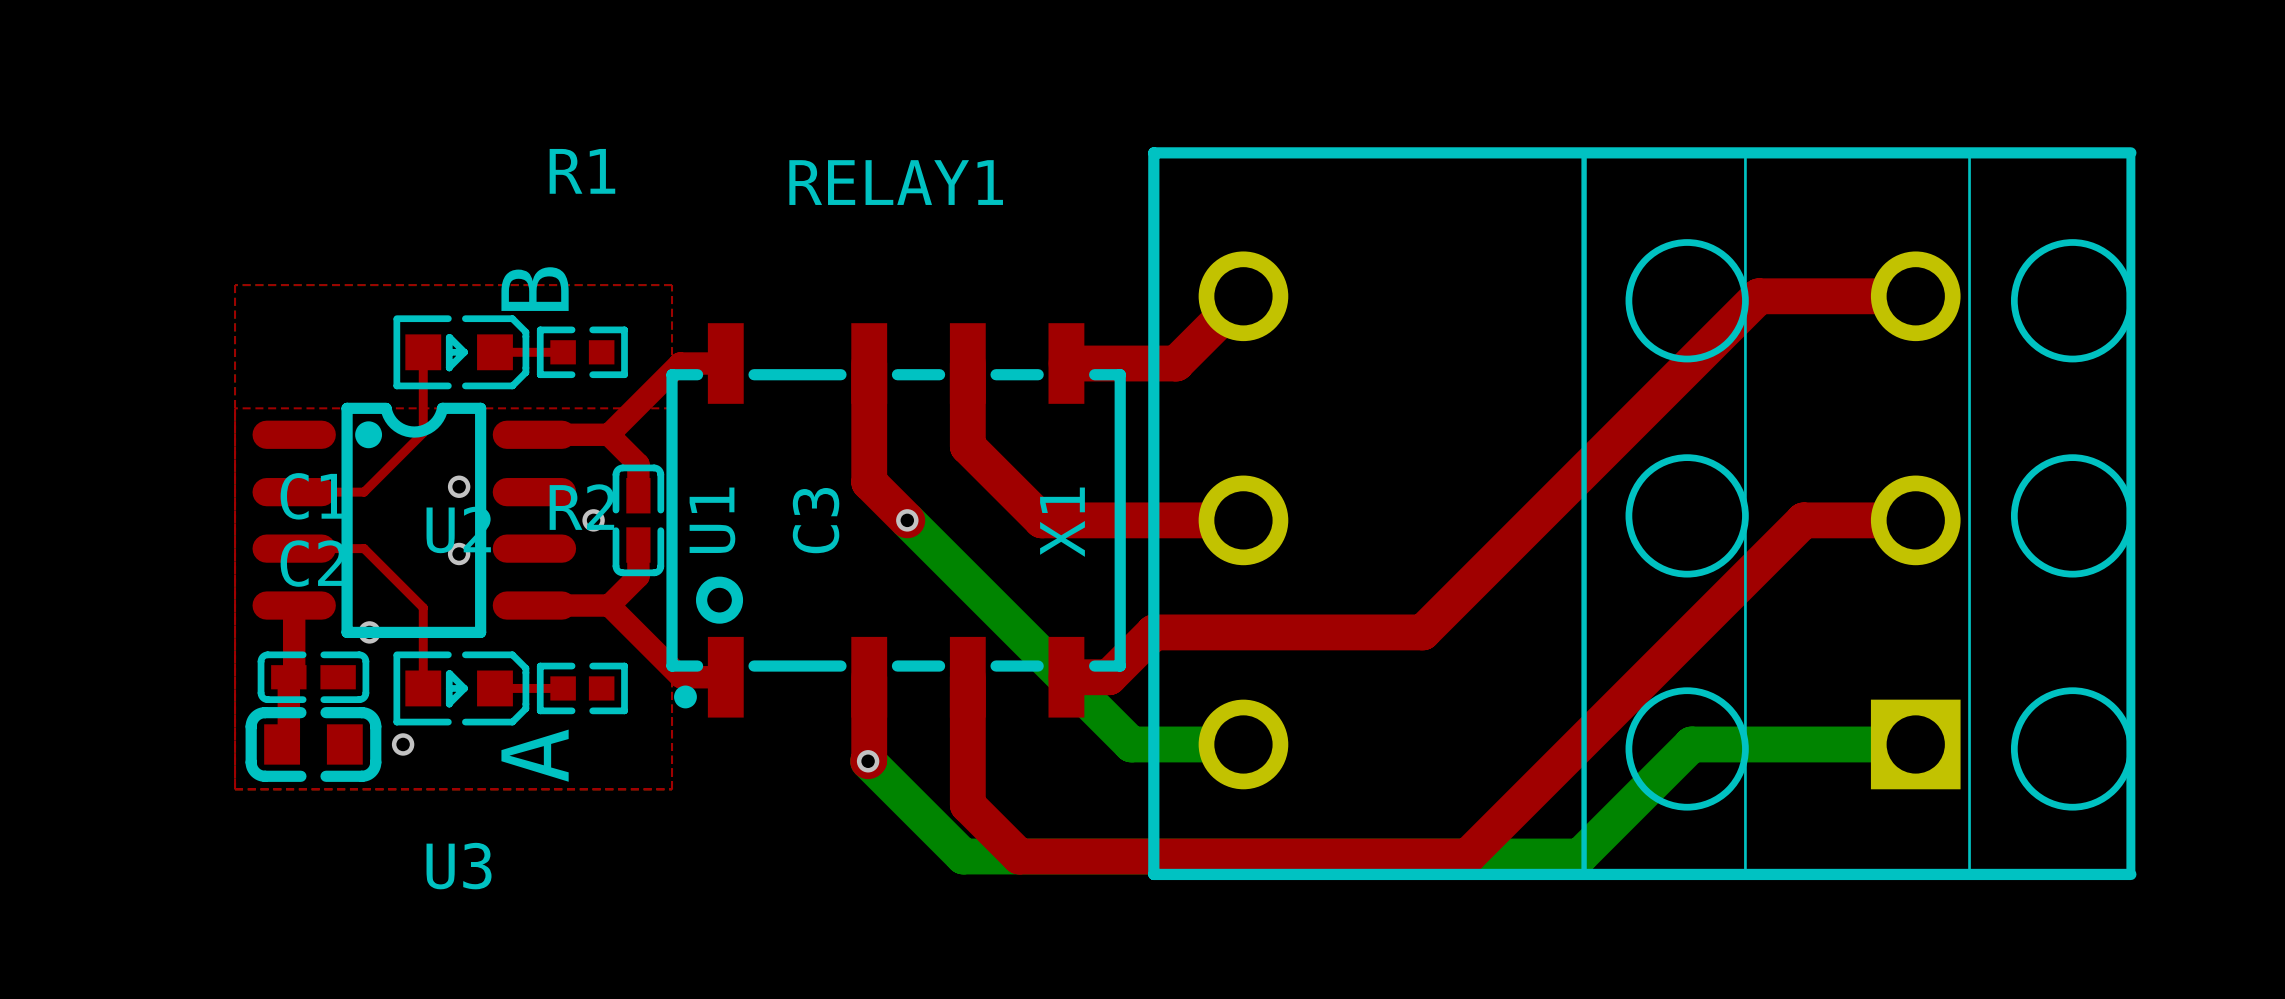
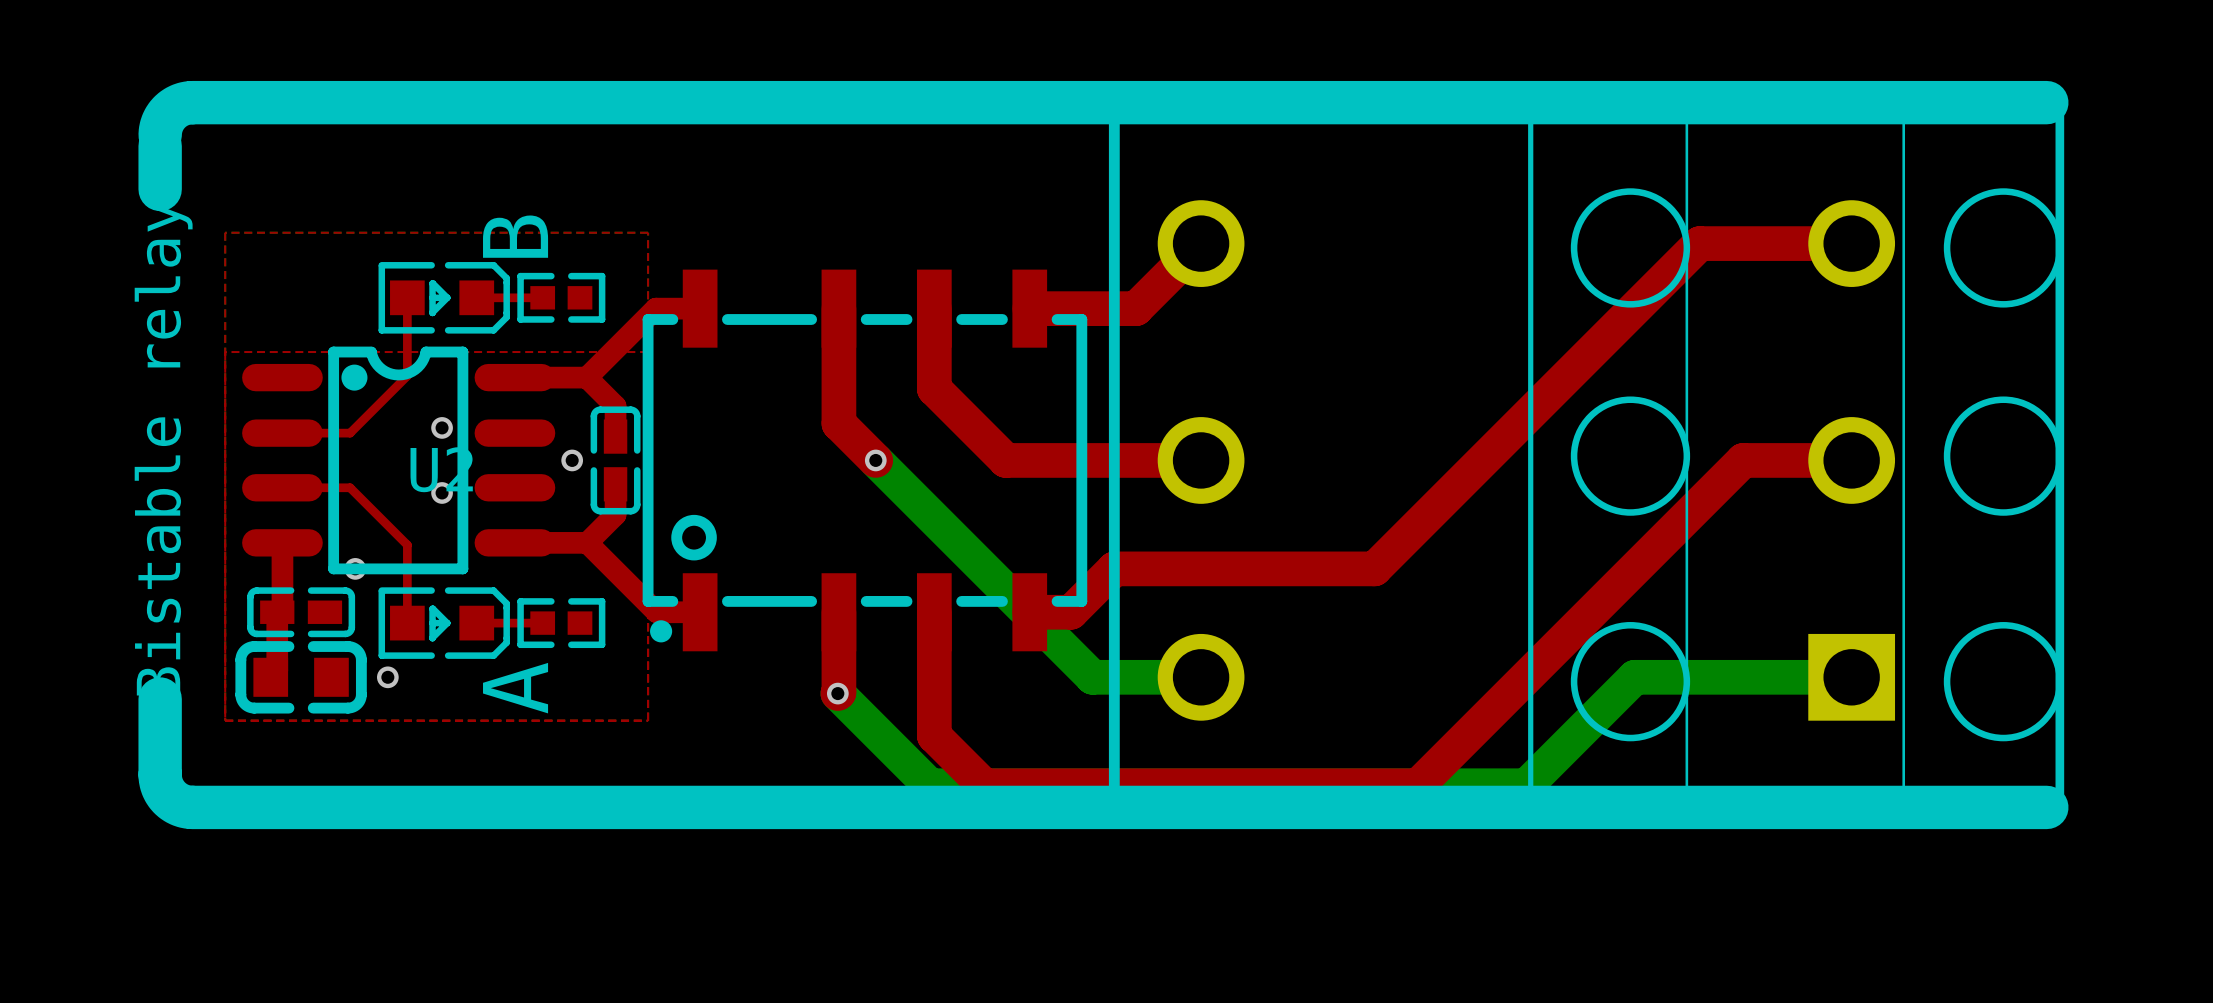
line: none -> (2046, 102) (192, 102) (180, 105) (169, 112) (162, 122) (160, 135)
R1 name: R1 (582, 171) -> none
RELAY1 name: RELAY1 (896, 182) -> none
line: none -> (160, 146) (160, 189)
C1 name: C1 (313, 496) -> none
text: none -> Bistable relay (163, 448)
R2 name: R2 (581, 507) -> none
U1 name: U1 (712, 520) -> none
C3 name: C3 (816, 520) -> none
X1 name: X1 (1062, 522) -> none
C2 name: C2 (312, 563) -> none
line: none -> (160, 699) (161, 783) (164, 791) (172, 800) (180, 804) (192, 807) (2046, 807)
U3 name: U3 (459, 866) -> none

